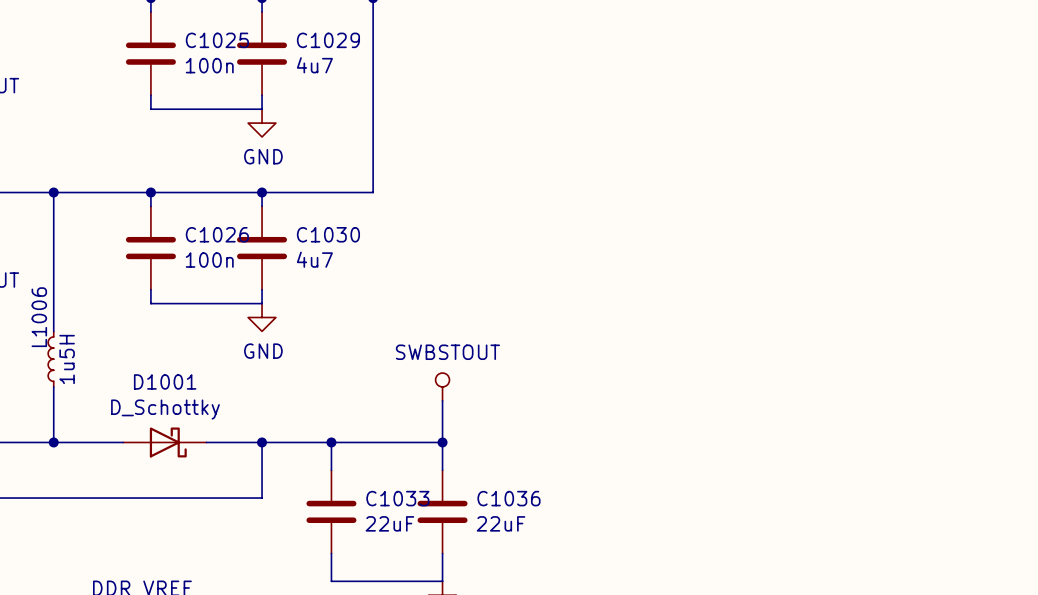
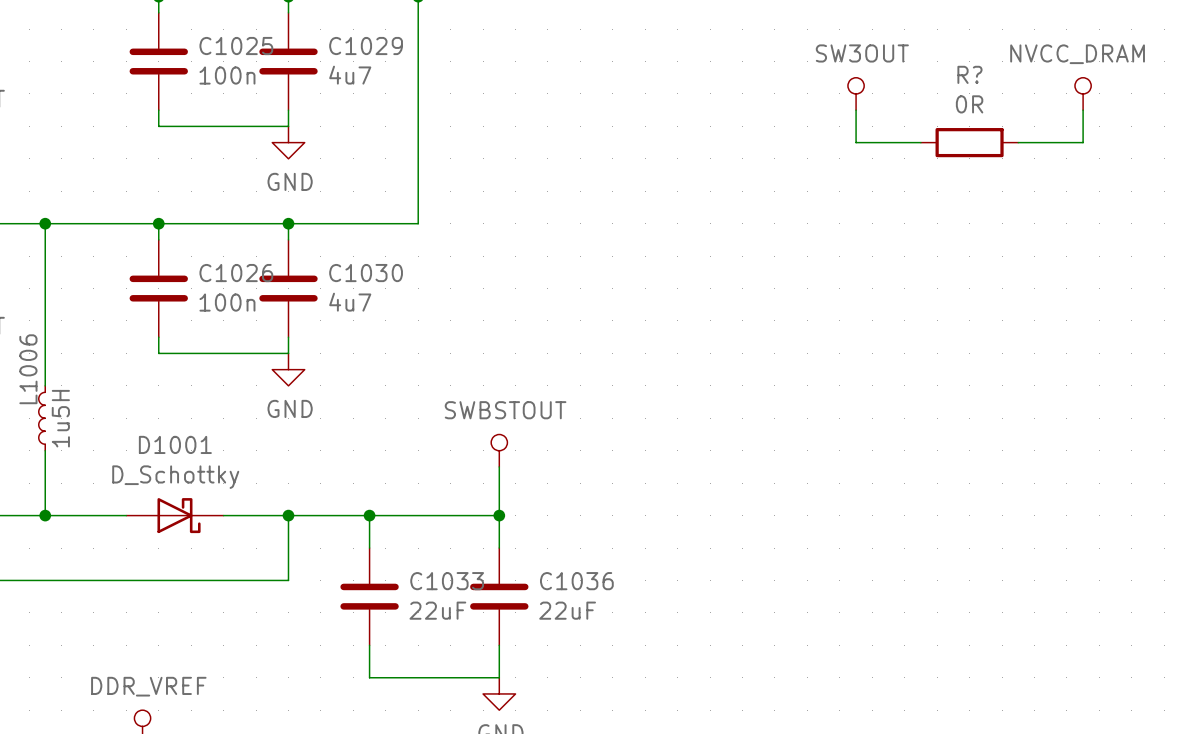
power symbol: none -> SW3OUT (856, 93)
power symbol: none -> NVCC_DRAM (1083, 93)
wire: none -> (856, 110) (856, 142) (920, 142)
wire: none -> (1083, 110) (1083, 142) (1018, 142)
R?: none -> 0R (969, 142)

